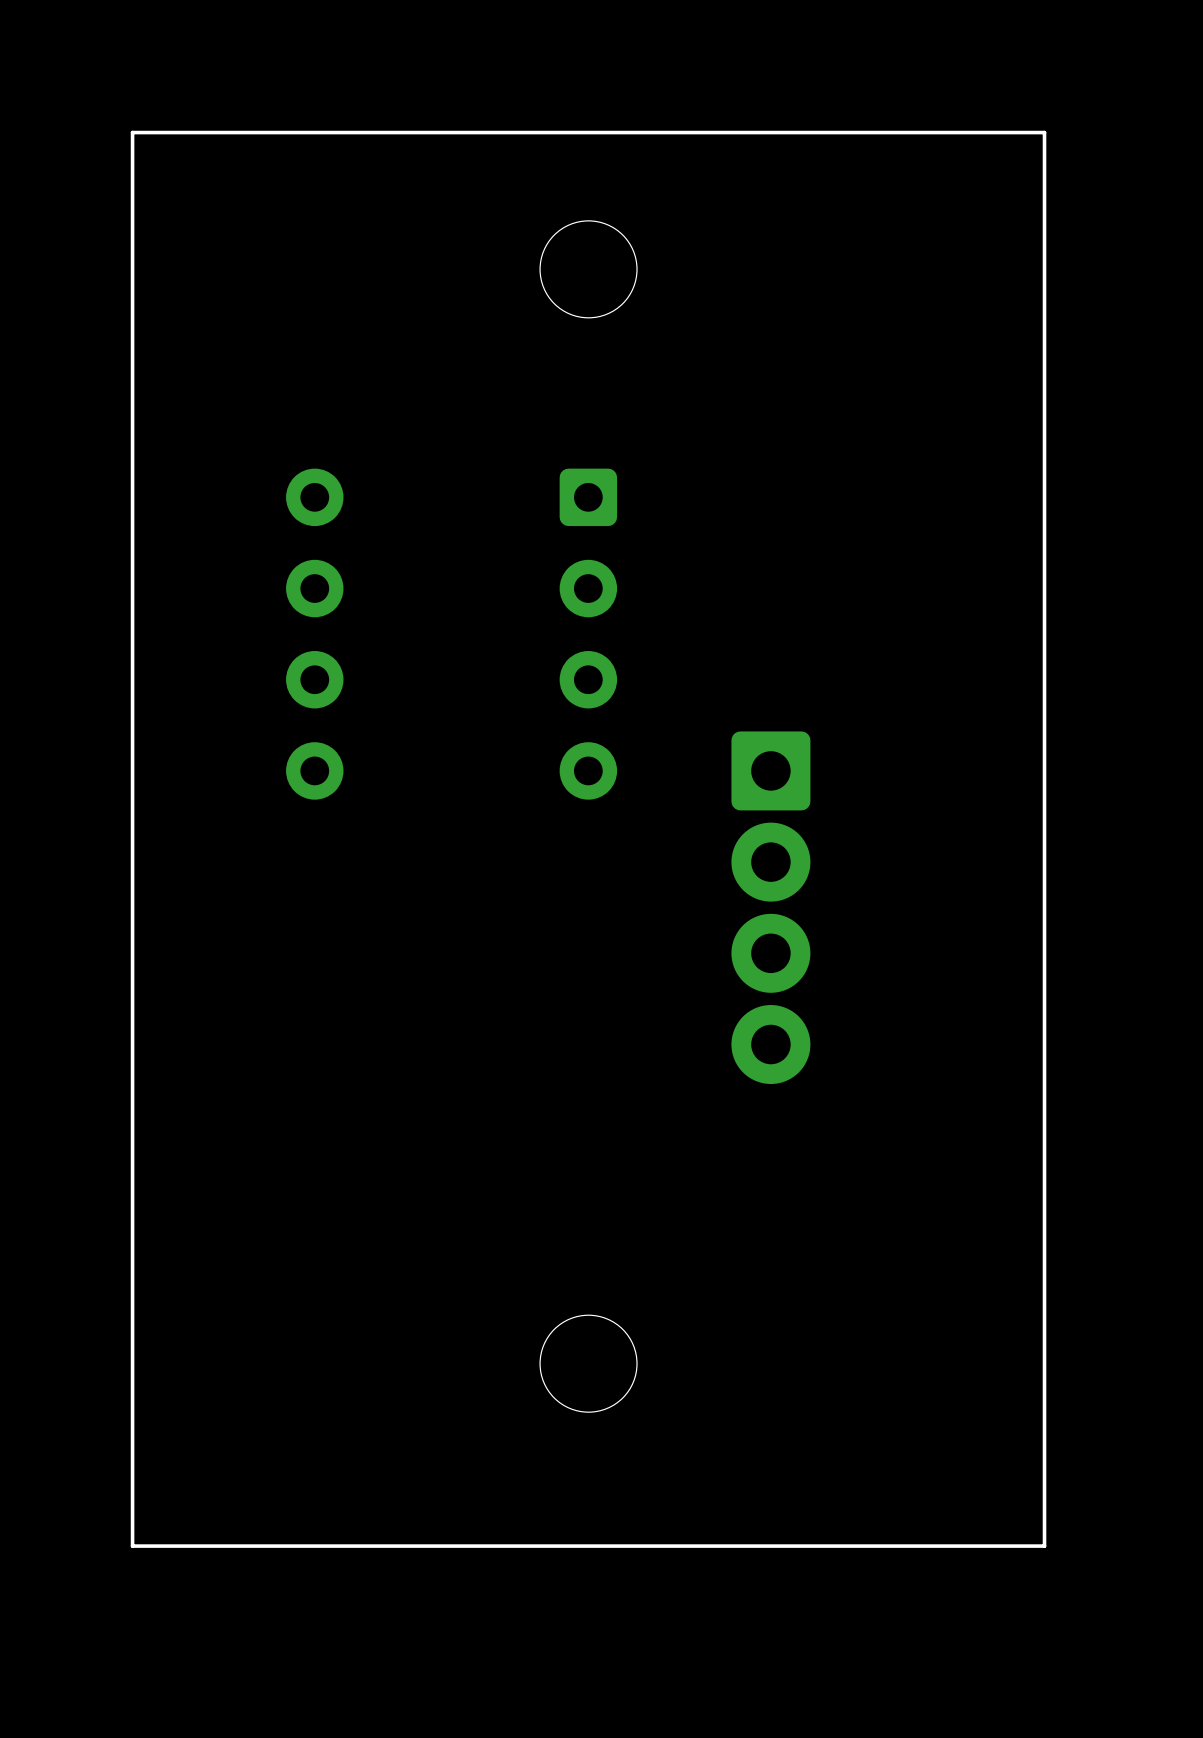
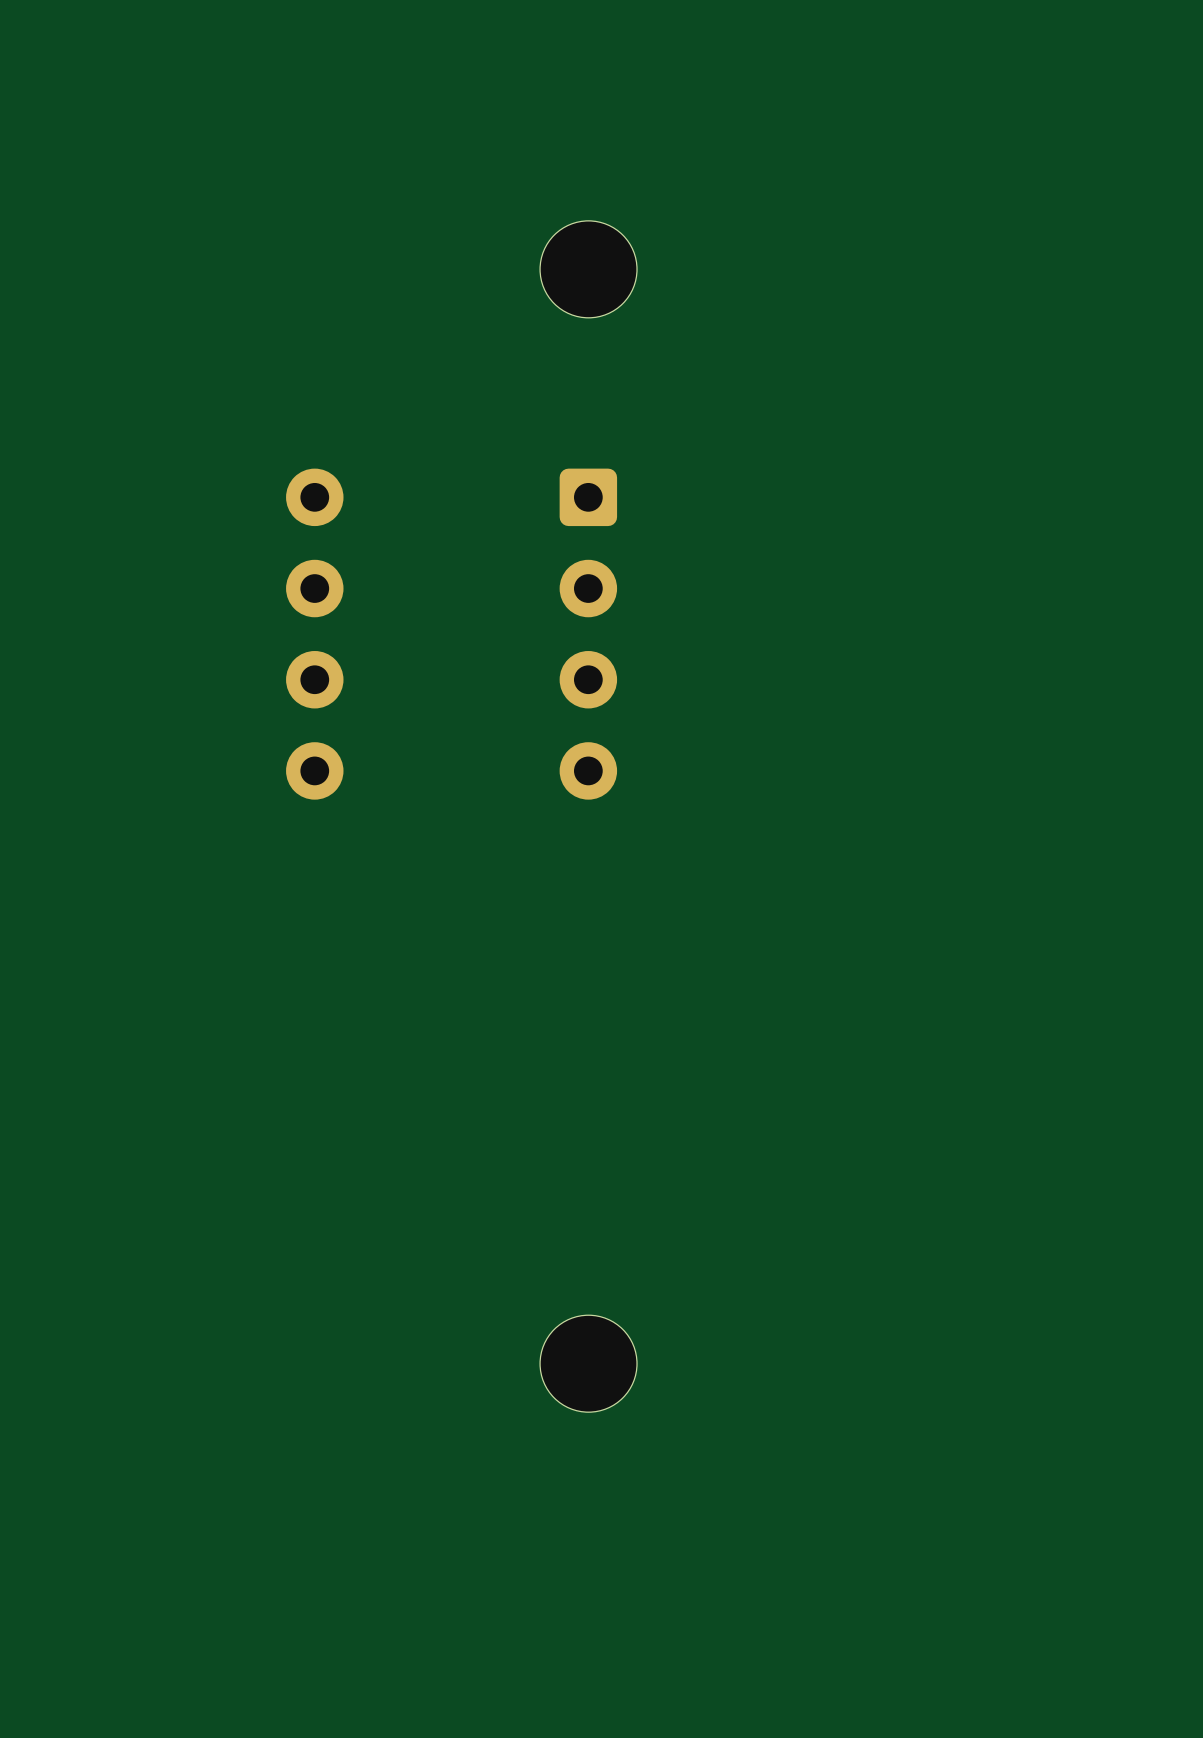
board edge: (1044, 132) (132, 132) (132, 1546) (1044, 1546) (1044, 132) -> none
part: (770, 907) -> none

